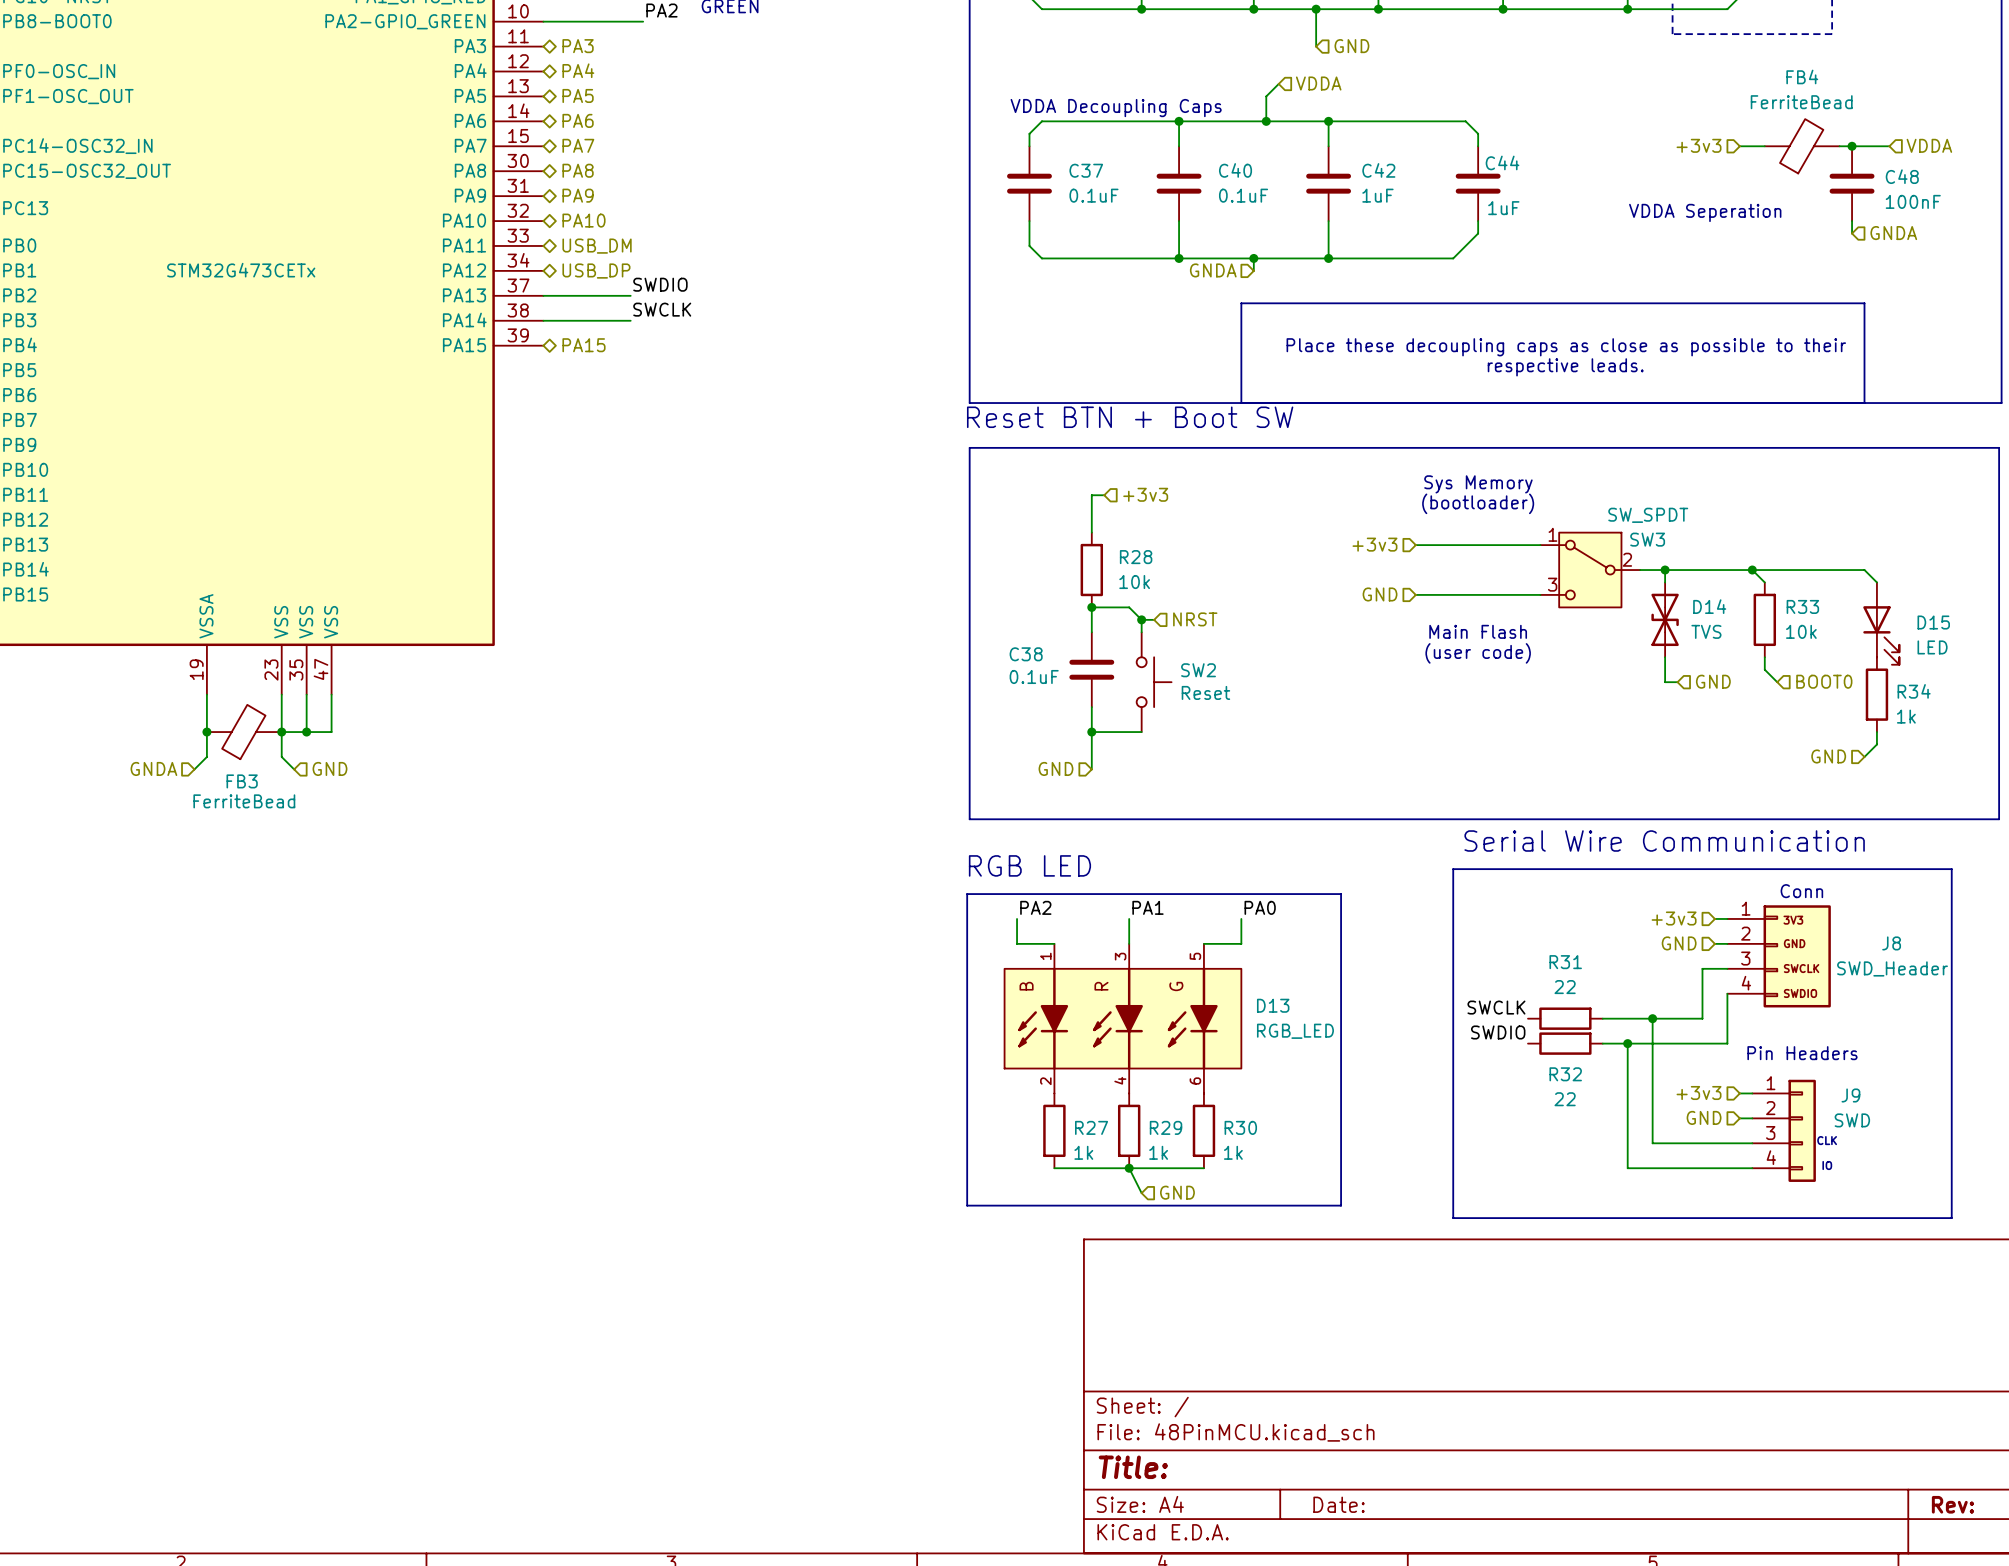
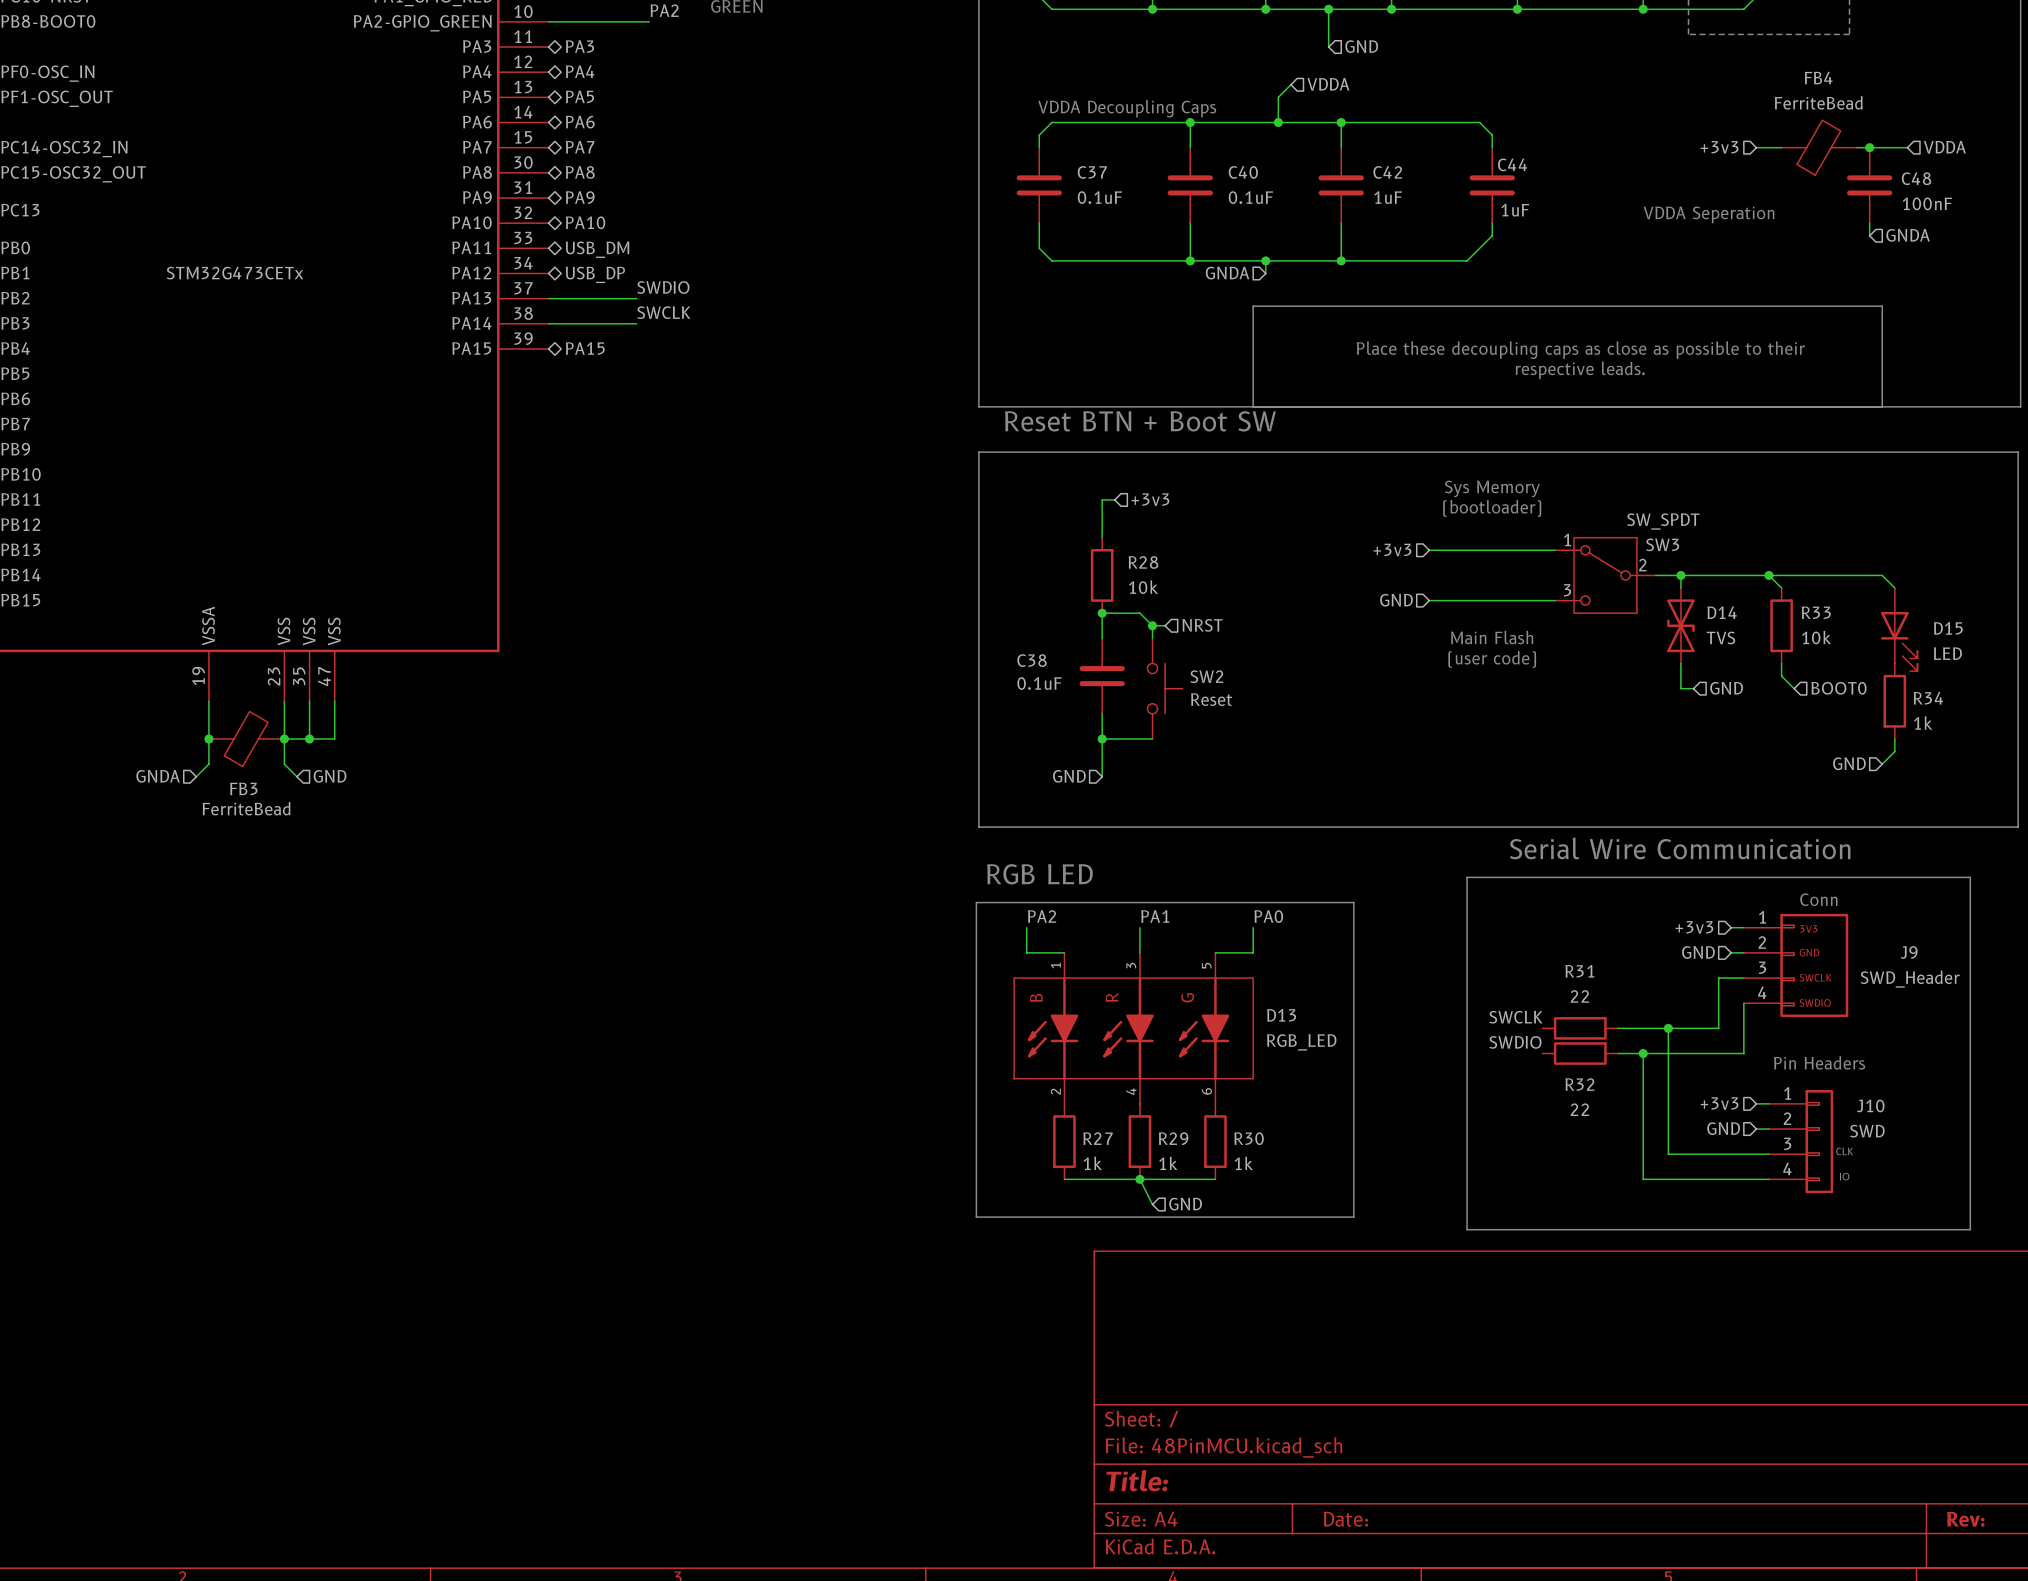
J8 name: J8 (1891, 943) -> J9 (1909, 952)
J9 name: J9 (1850, 1095) -> J10 (1870, 1105)

